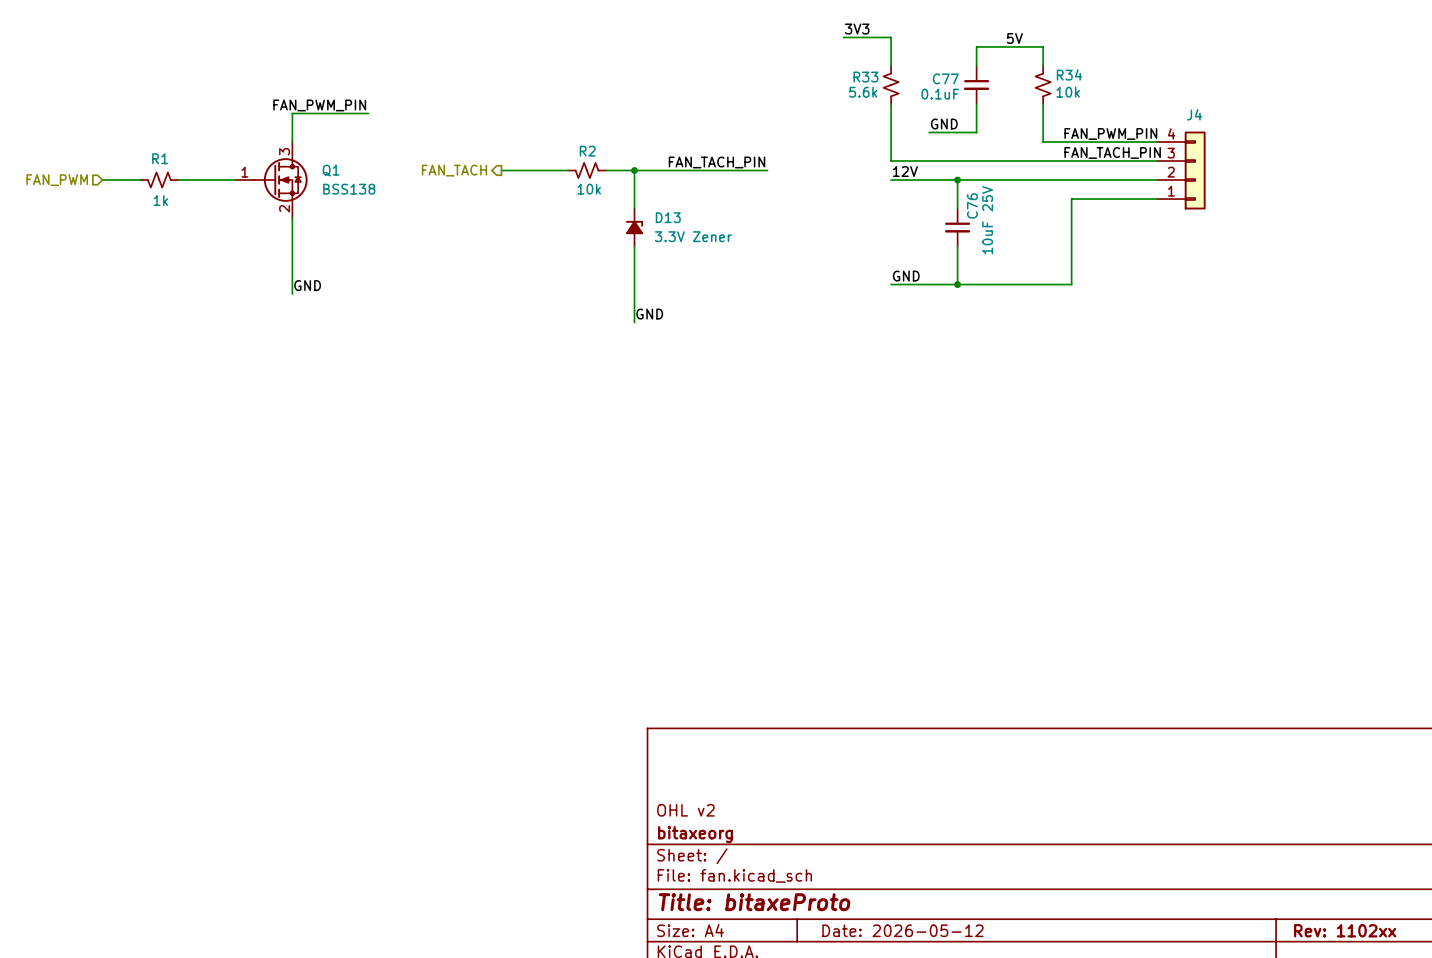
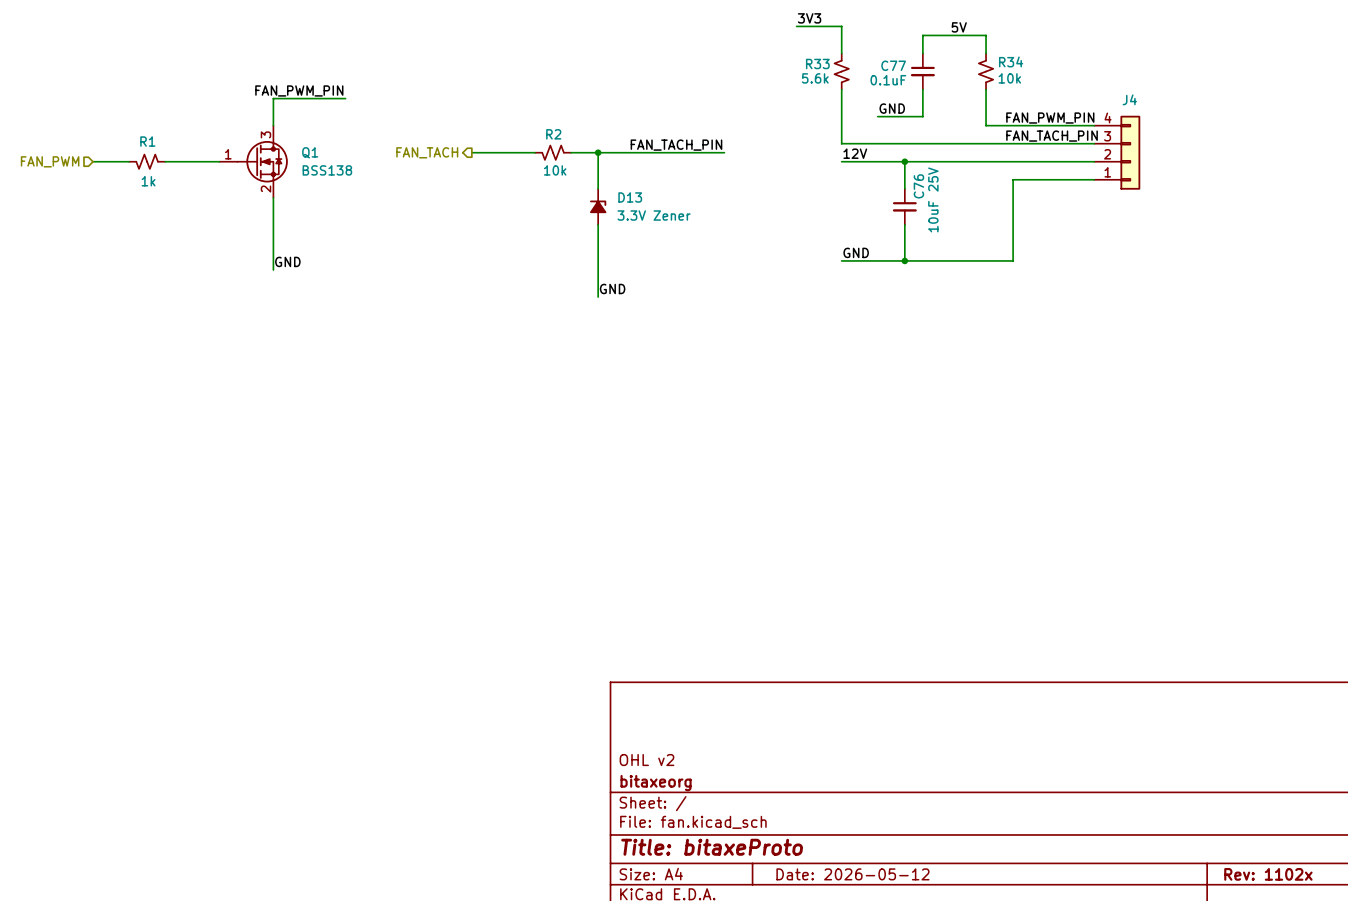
title block: Rev: 1102xx (1345, 930) -> Rev: 1102x (1268, 874)

